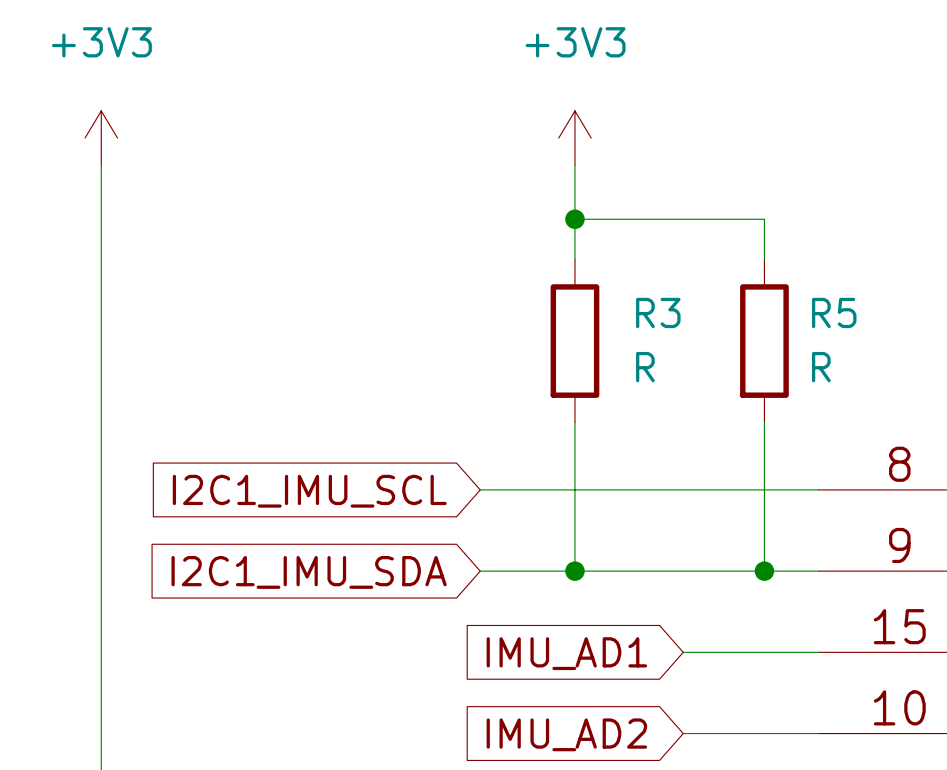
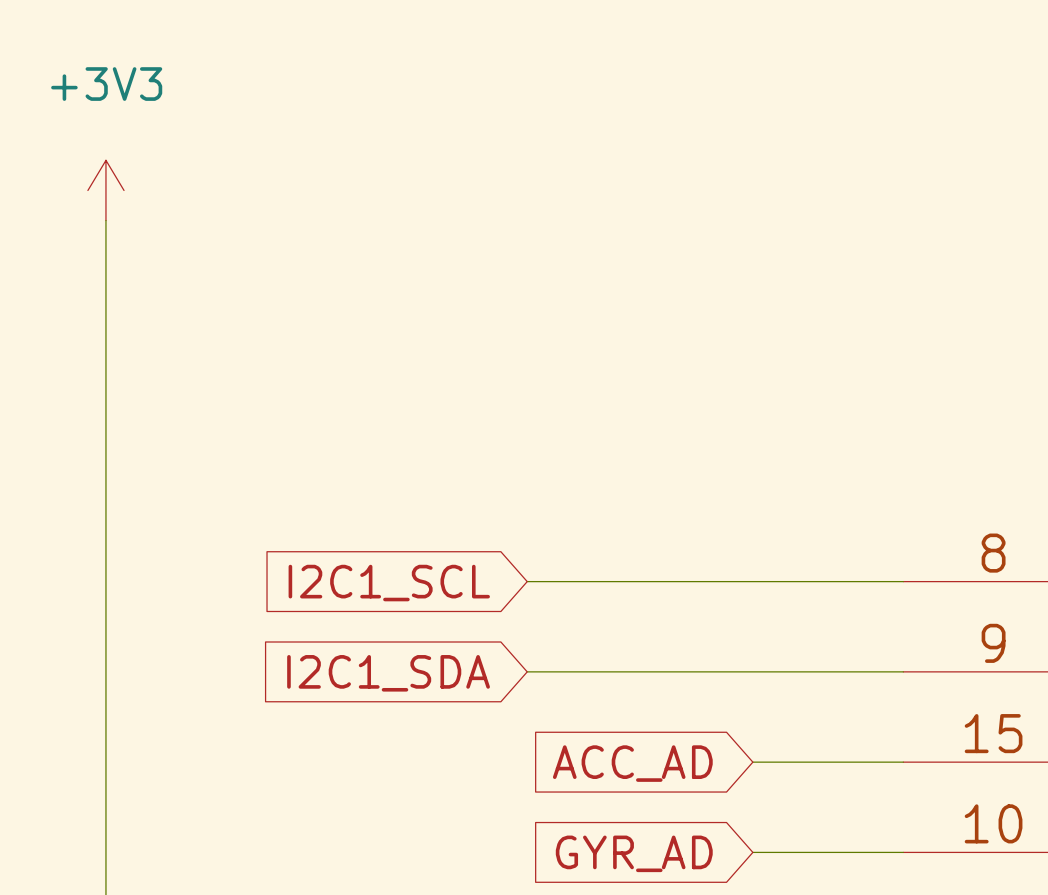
power symbol: +3V3 (574, 138) -> none
wire: (574, 165) (574, 259) -> none
wire: (574, 219) (764, 219) (764, 259) -> none
junction: (574, 219) -> none
R3: R (574, 341) -> none
R5: R (764, 341) -> none
wire: (574, 422) (574, 571) -> none
wire: (764, 422) (764, 571) -> none
global label: I2C1_IMU_SCL (309, 491) -> I2C1_SCL (389, 583)
junction: (574, 571) -> none
junction: (764, 571) -> none
global label: I2C1_IMU_SDA (309, 572) -> I2C1_SDA (388, 673)
global label: IMU_AD1 (566, 653) -> ACC_AD (632, 763)
global label: IMU_AD2 (566, 734) -> GYR_AD (634, 853)

